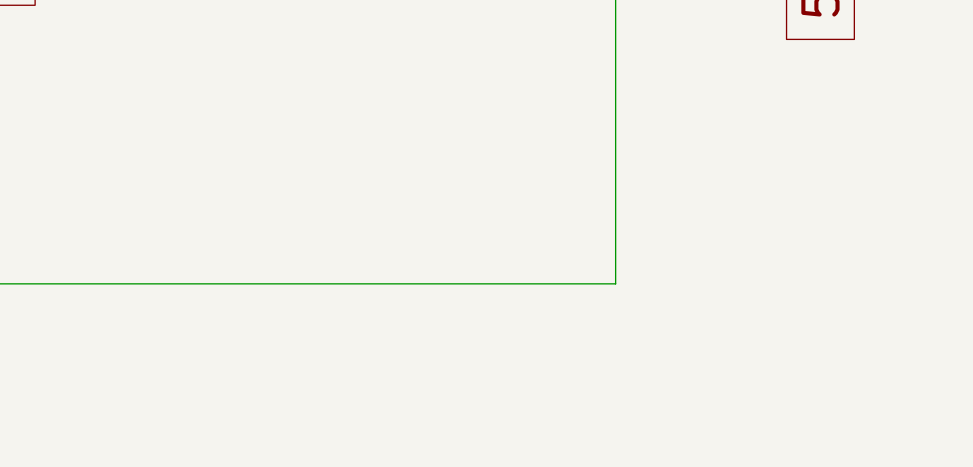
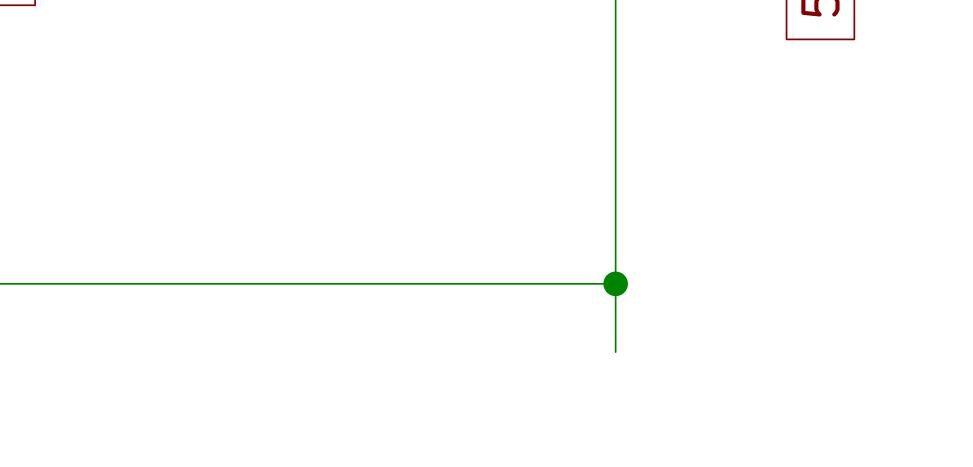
wire: none -> (615, 283) (615, 352)
junction: none -> (615, 283)

